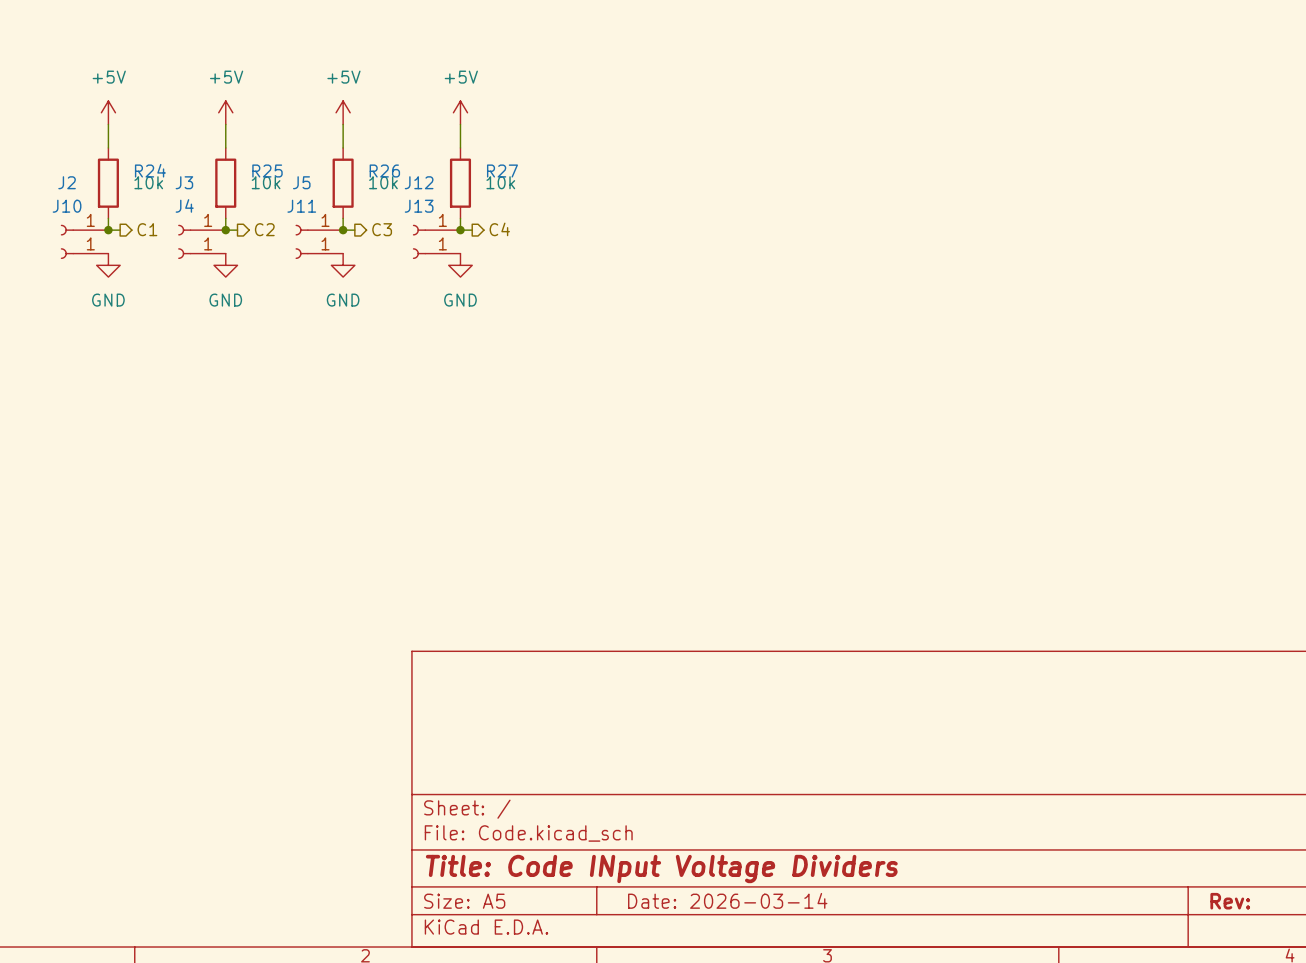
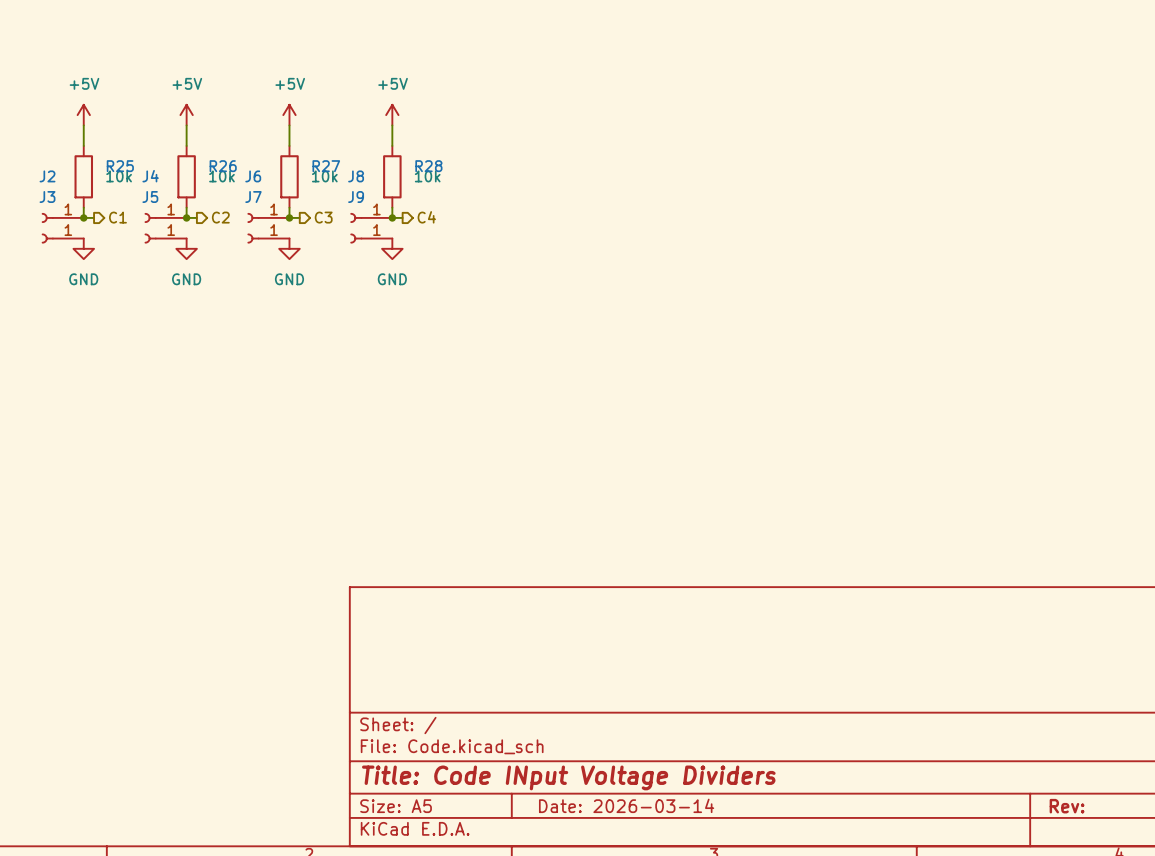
R24 name: R24 (150, 170) -> R25 (120, 166)
R25 name: R25 (267, 171) -> R26 (223, 166)
R26 name: R26 (384, 171) -> R27 (326, 166)
R27 name: R27 (502, 171) -> R28 (428, 166)
J3 name: J3 (184, 182) -> J4 (150, 176)
J5 name: J5 (301, 182) -> J6 (253, 176)
J12 name: J12 (419, 182) -> J8 (356, 176)
J4 name: J4 (184, 205) -> J5 (150, 197)
J10 name: J10 (67, 206) -> J3 (47, 197)
J11 name: J11 (301, 206) -> J7 (253, 197)
J13 name: J13 (419, 206) -> J9 (356, 197)

